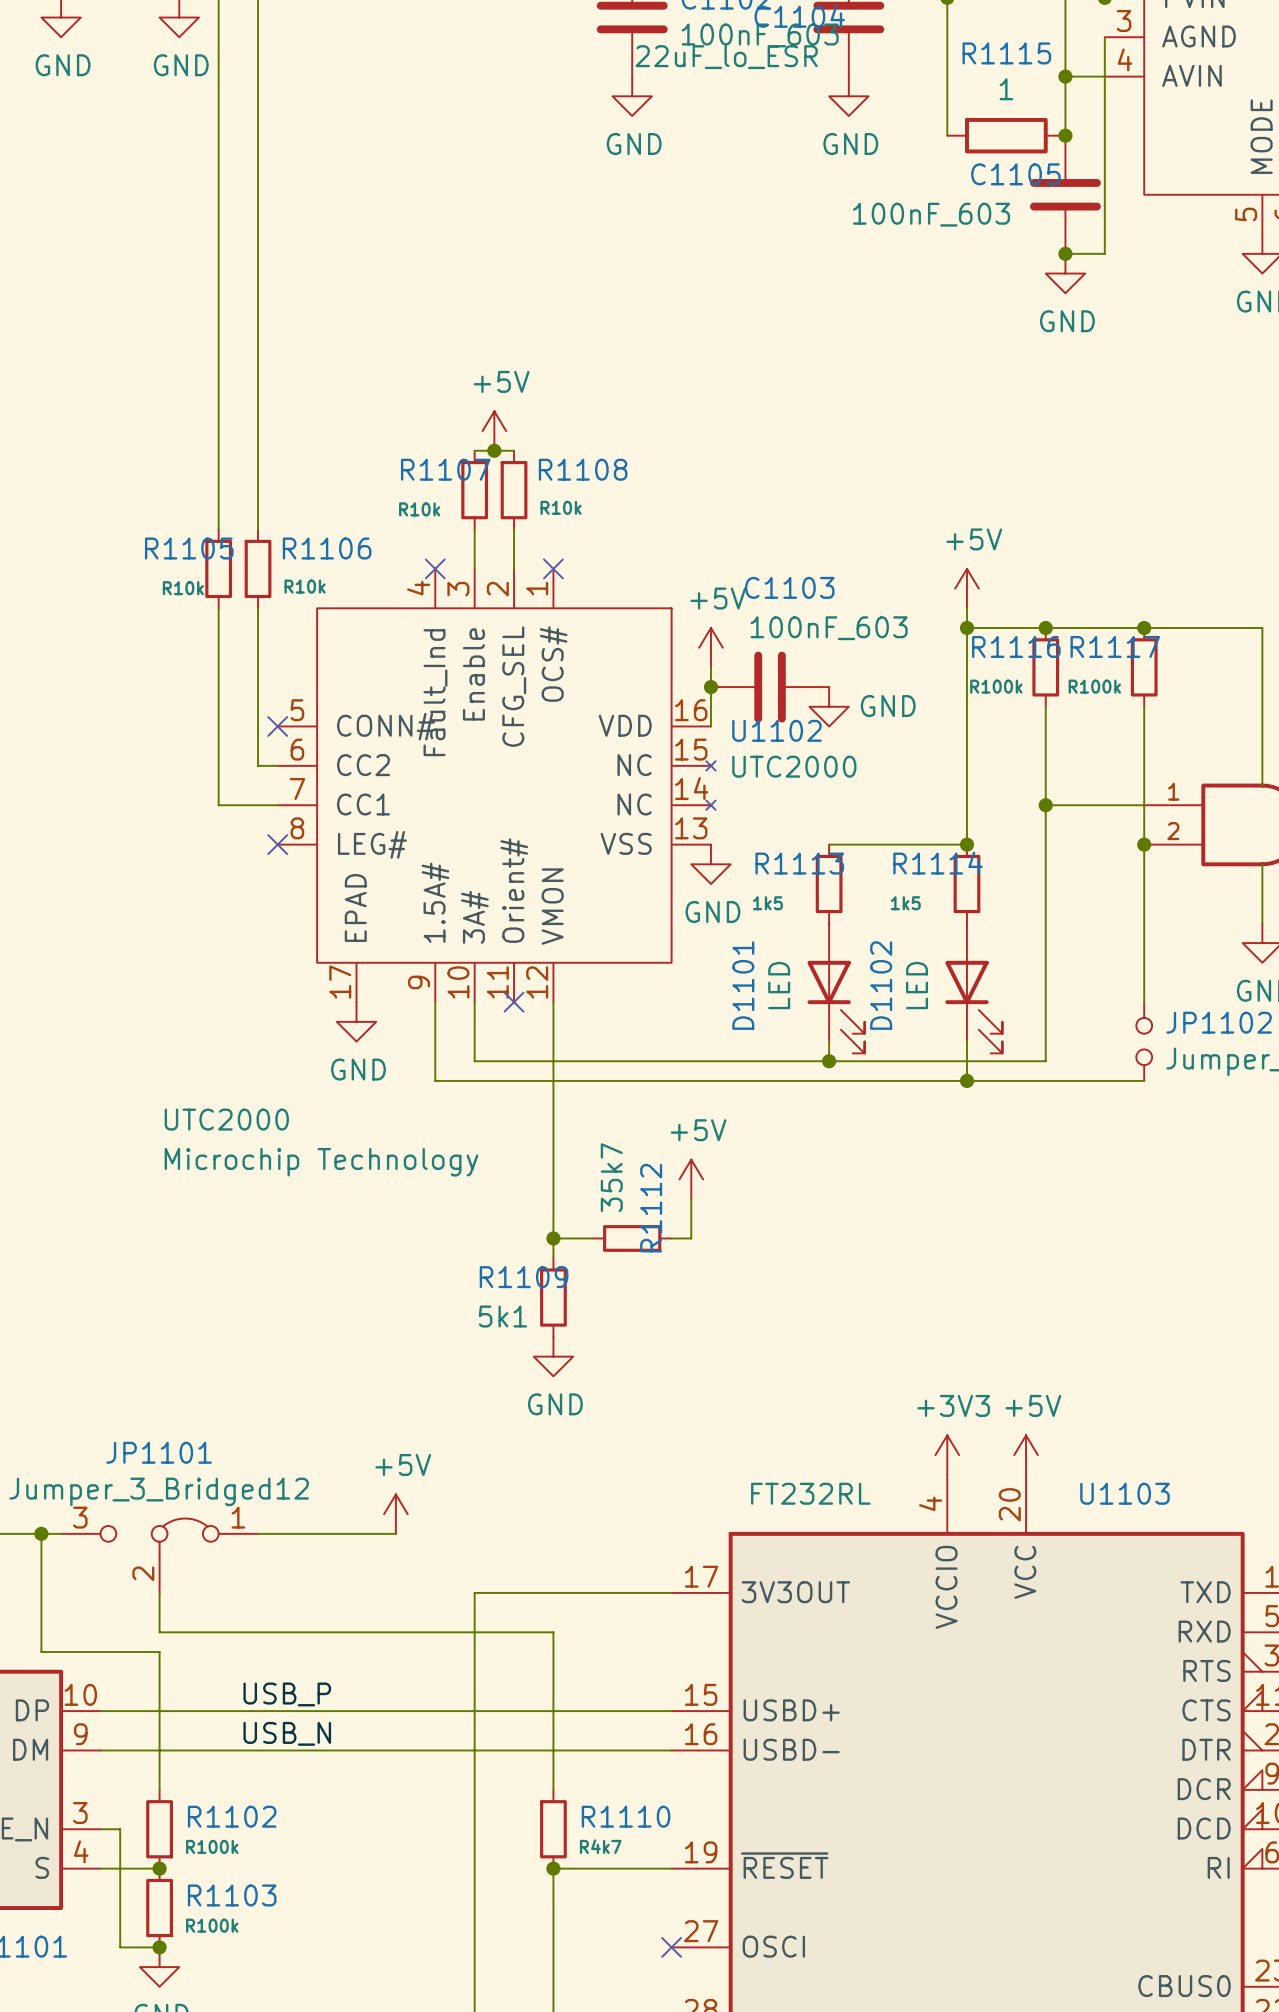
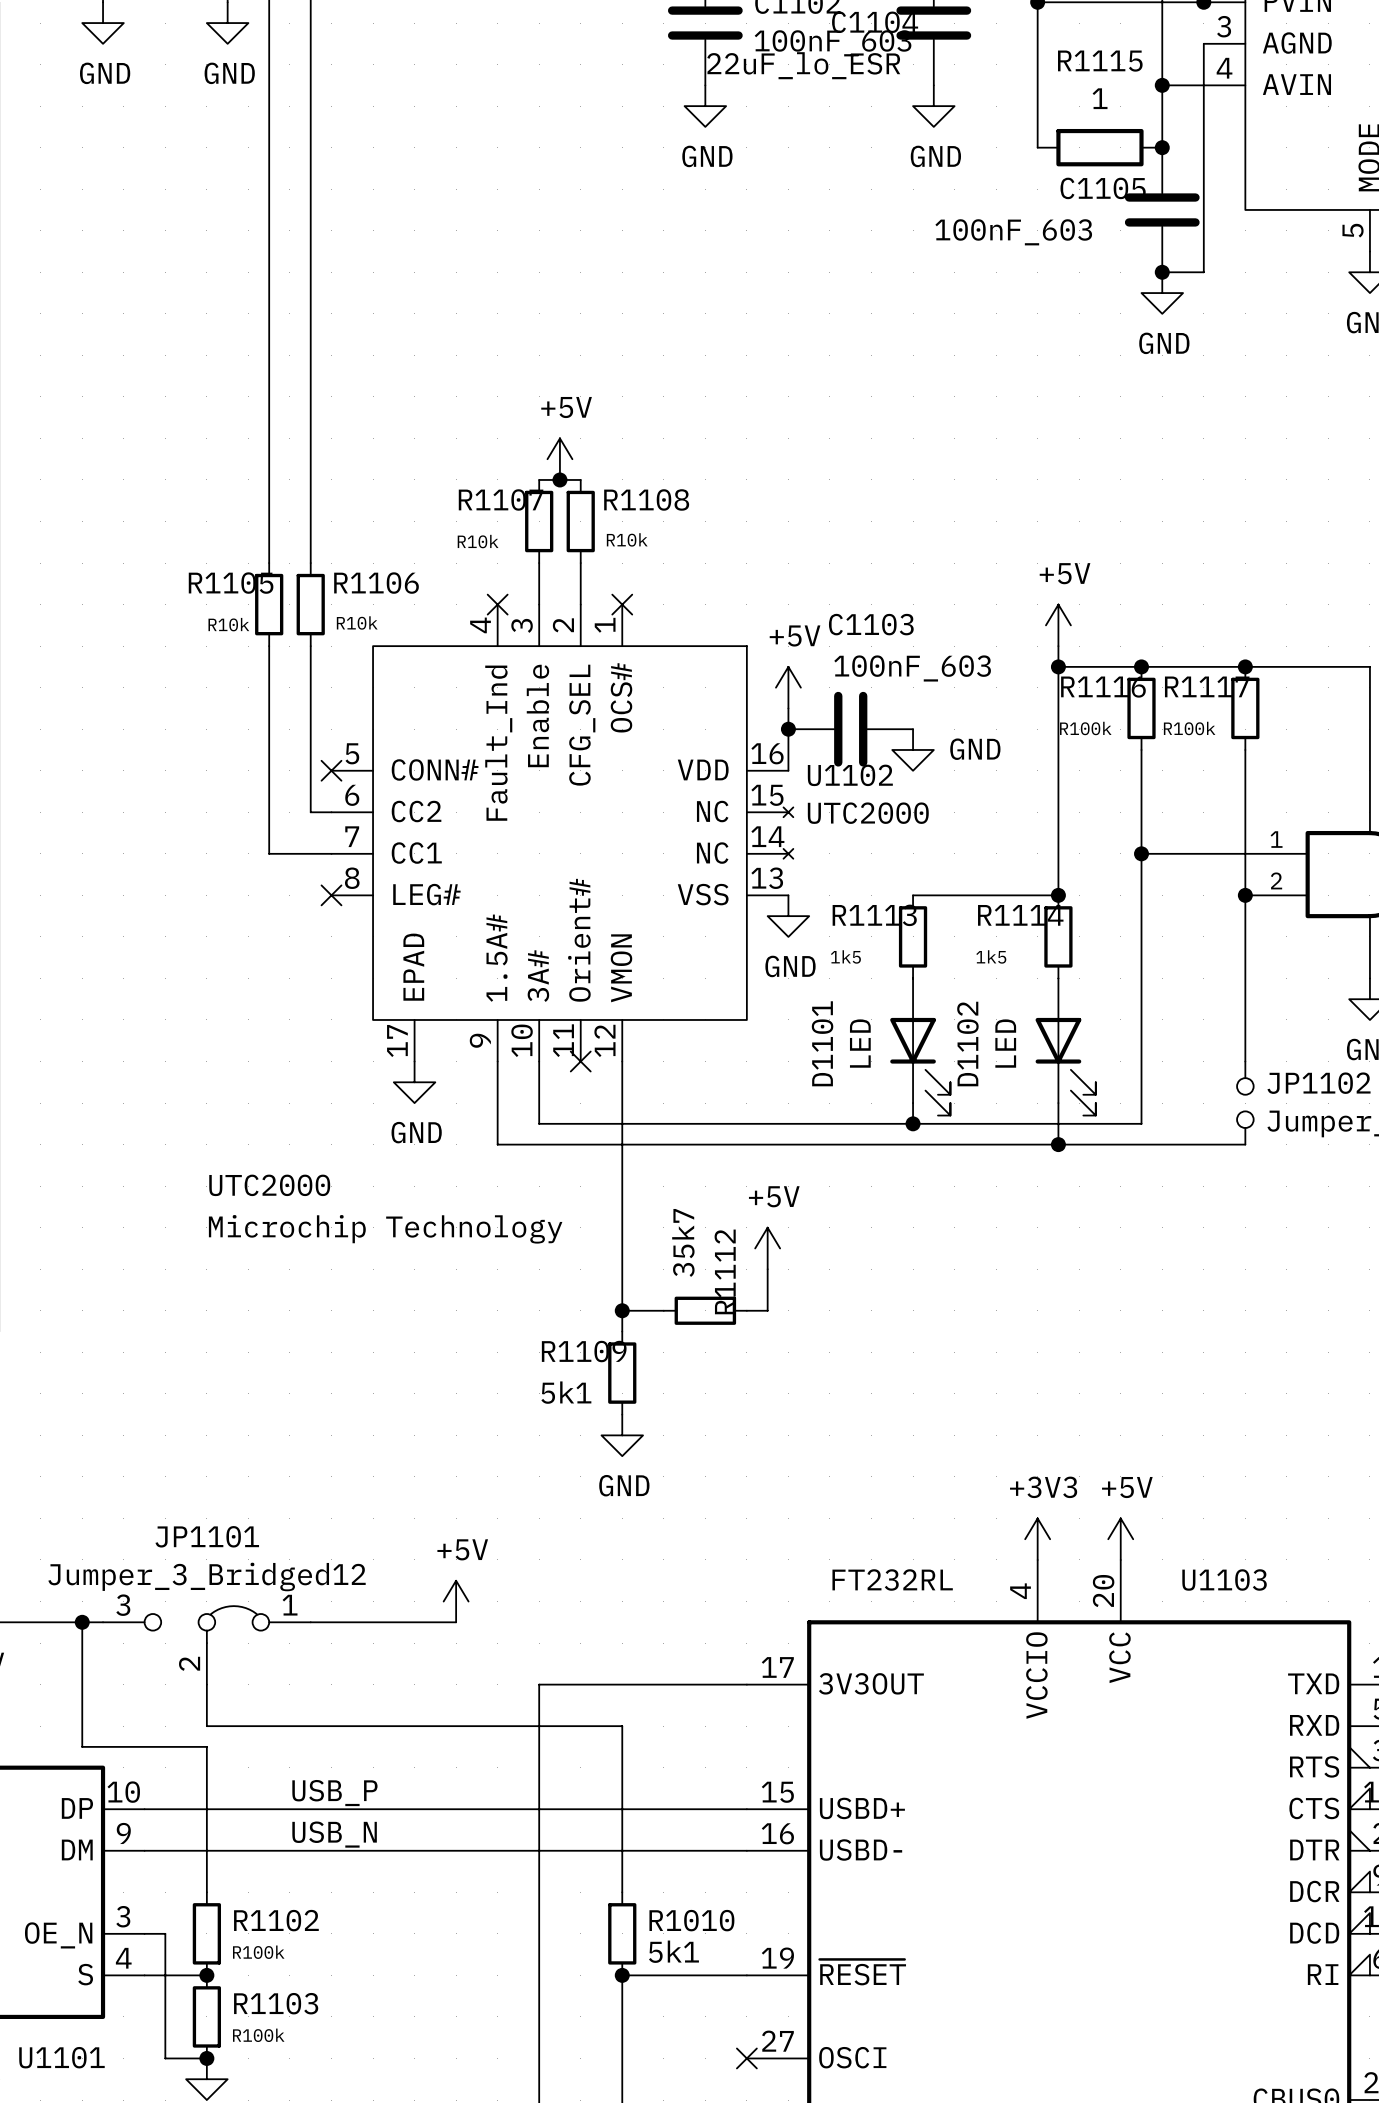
R1110 name: R1110 (626, 1816) -> R1010 (691, 1920)
R1110 value: R4k7 (600, 1846) -> 5k1 (673, 1951)

